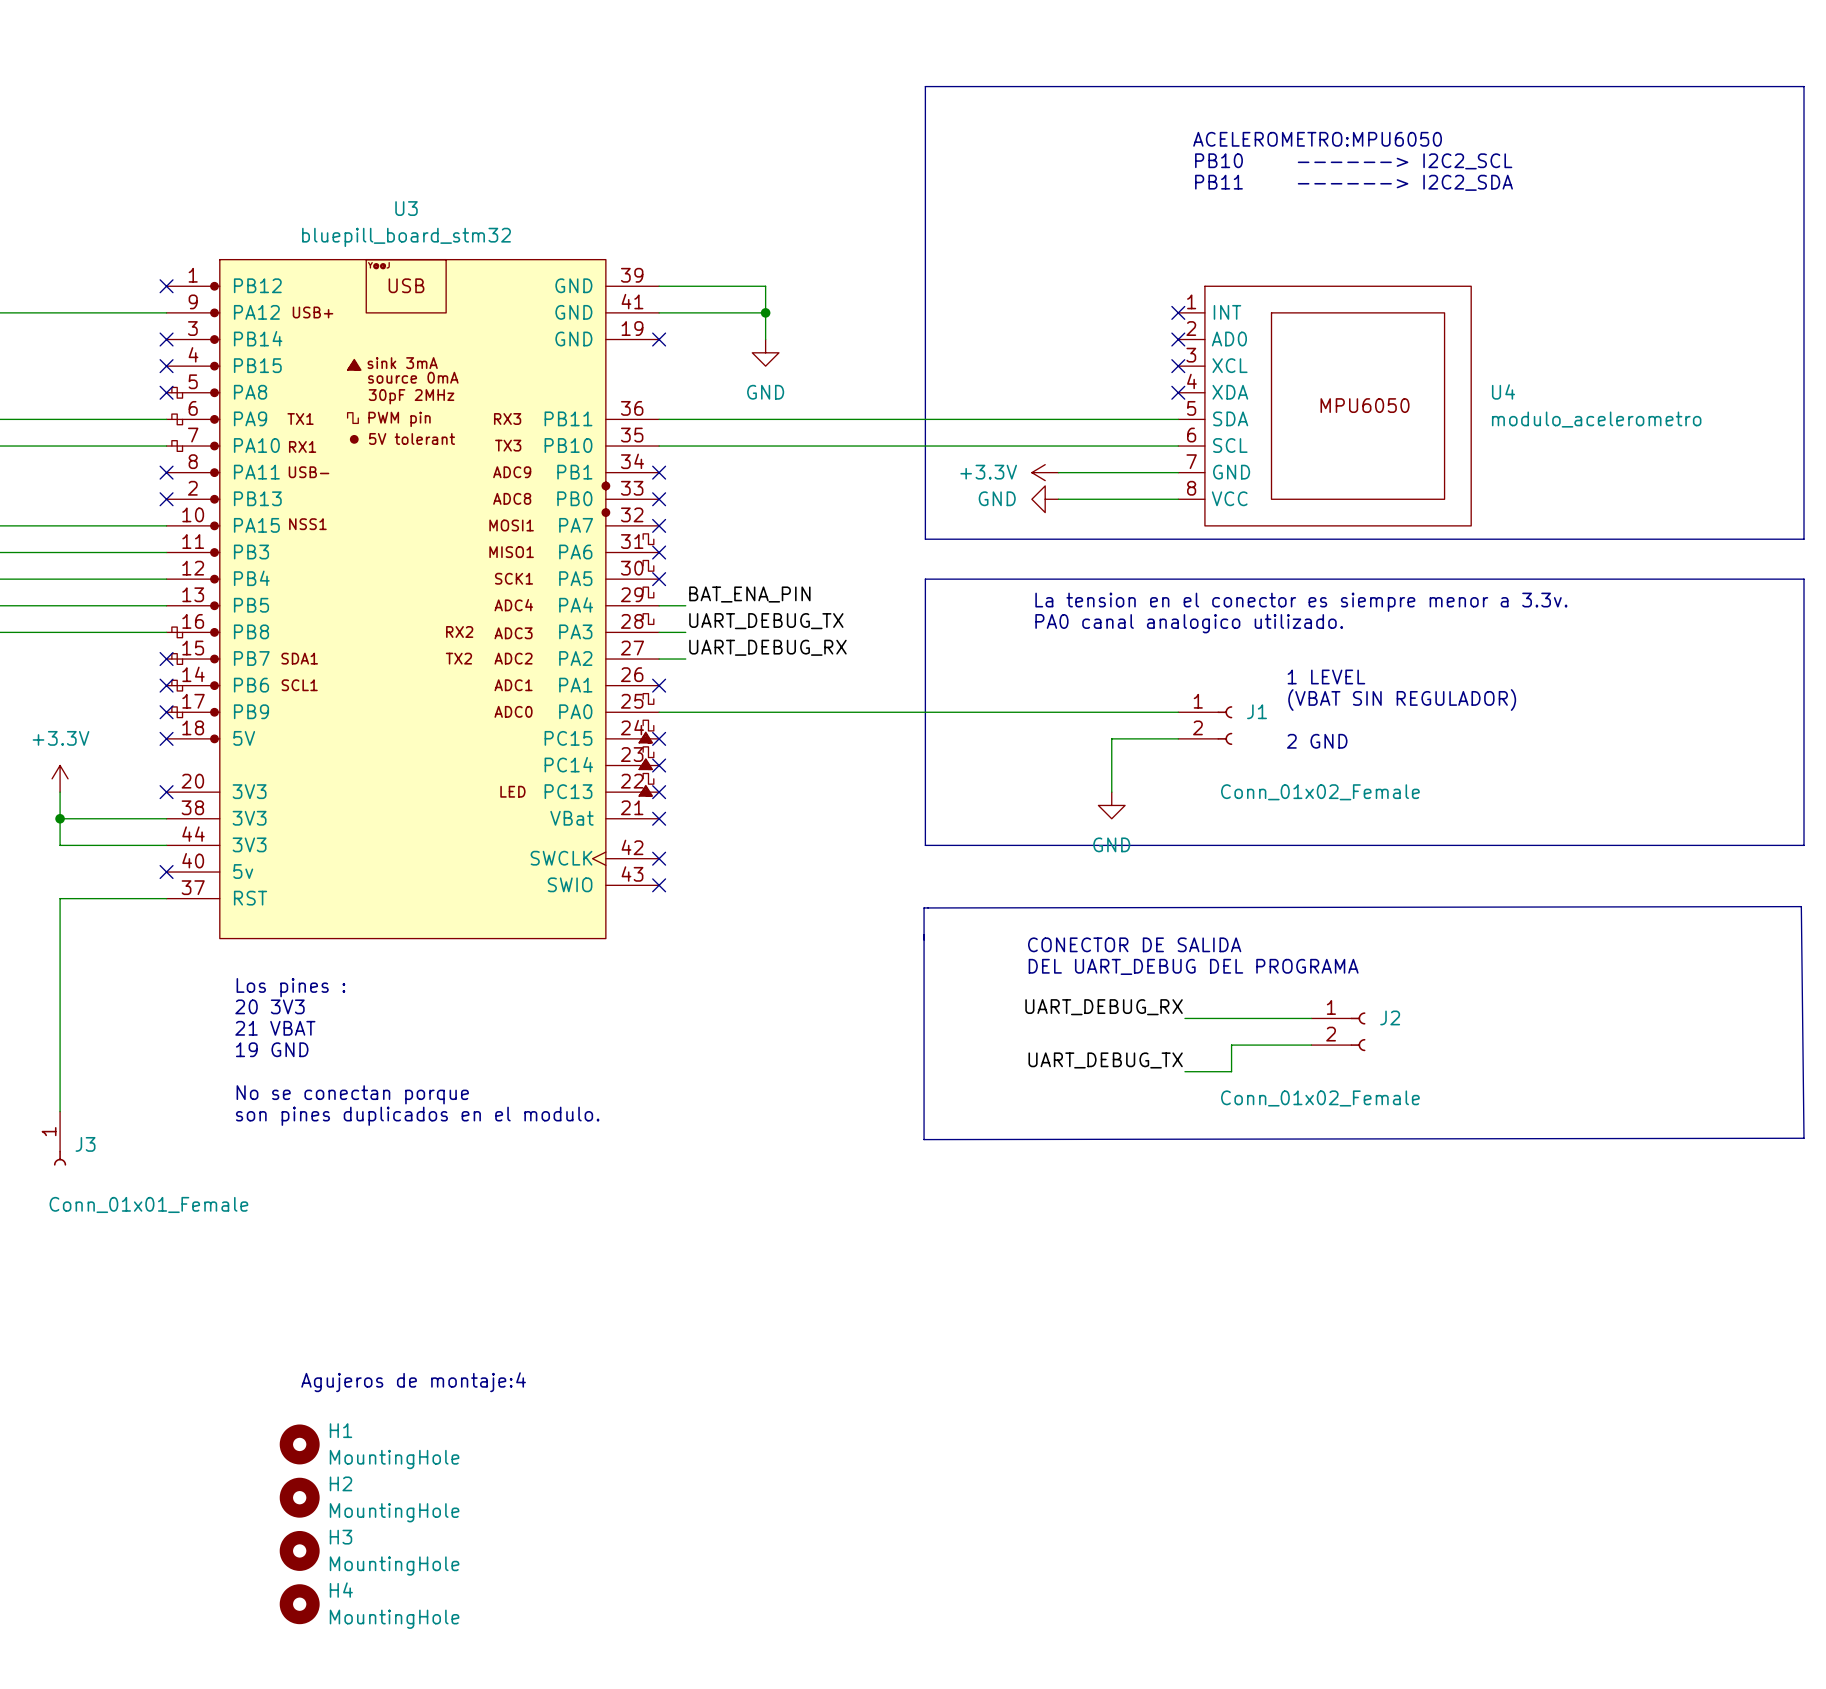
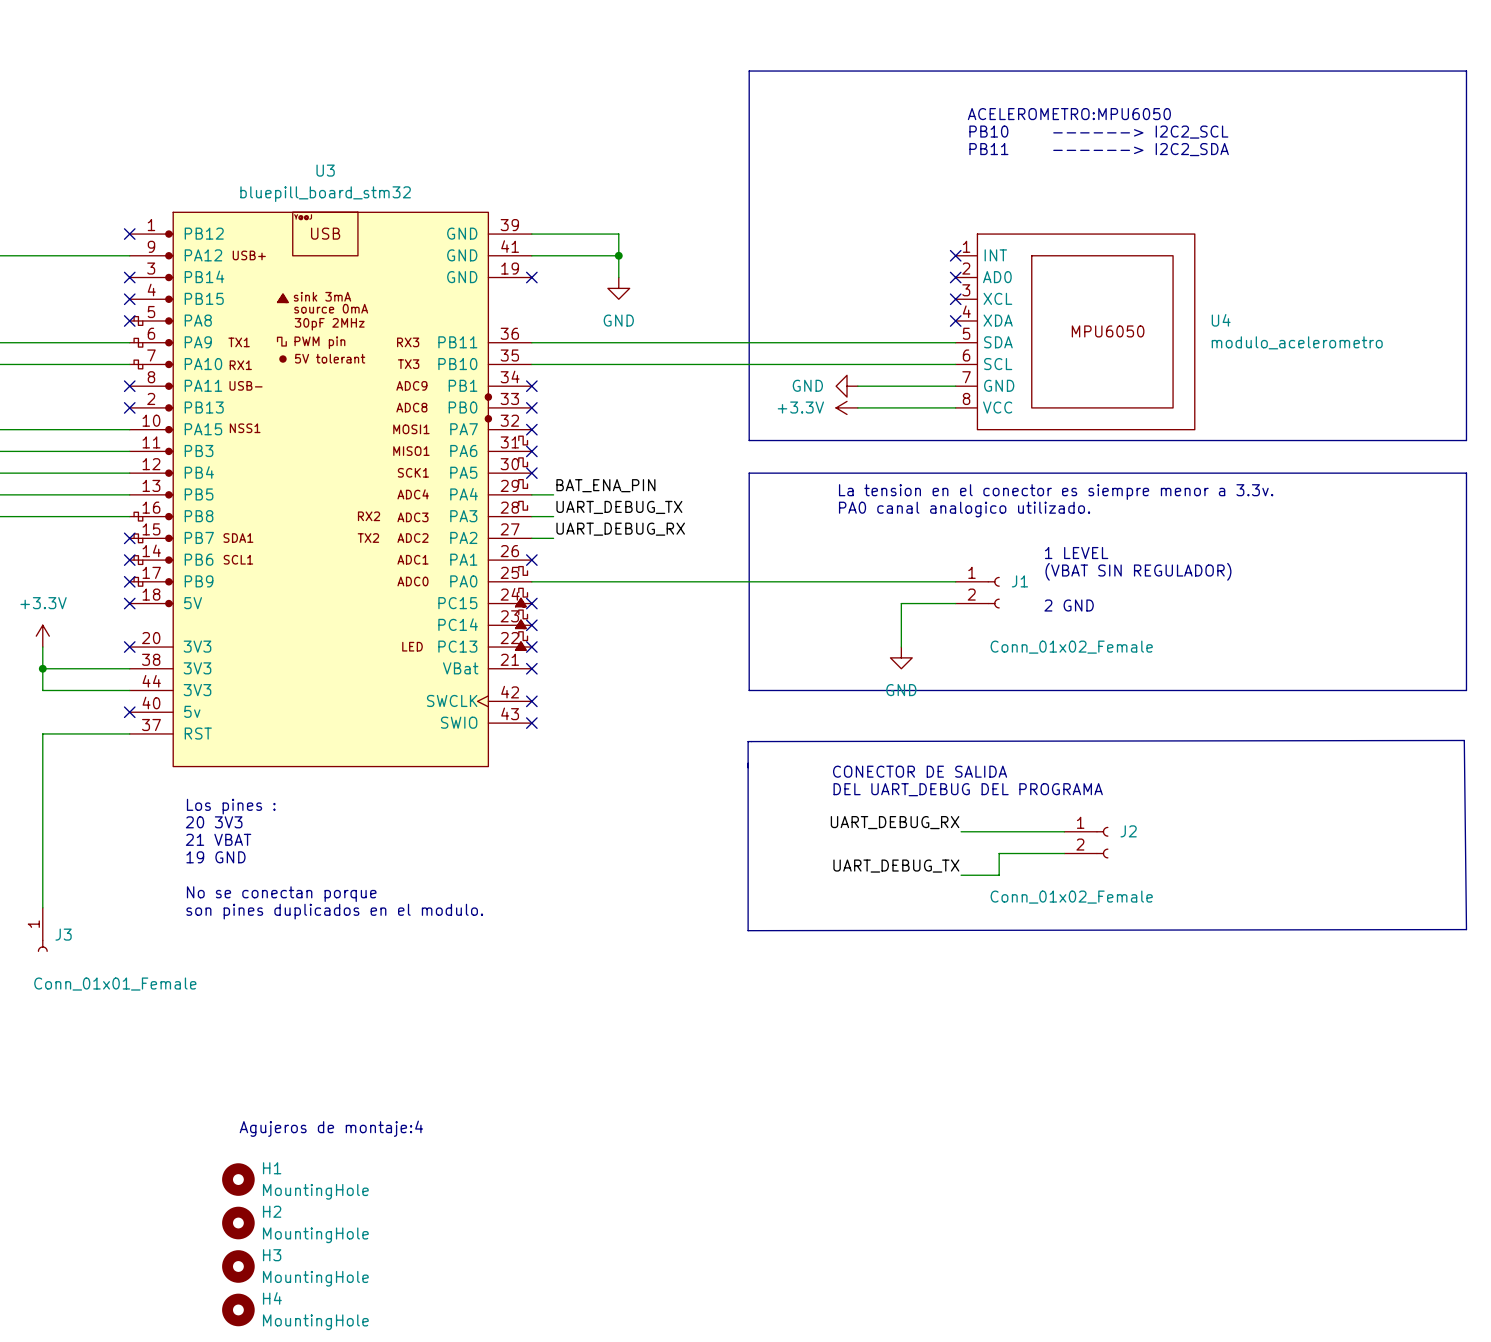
power symbol: +3.3V (1045, 472) -> GND (847, 386)
power symbol: GND (1045, 499) -> +3.3V (847, 407)

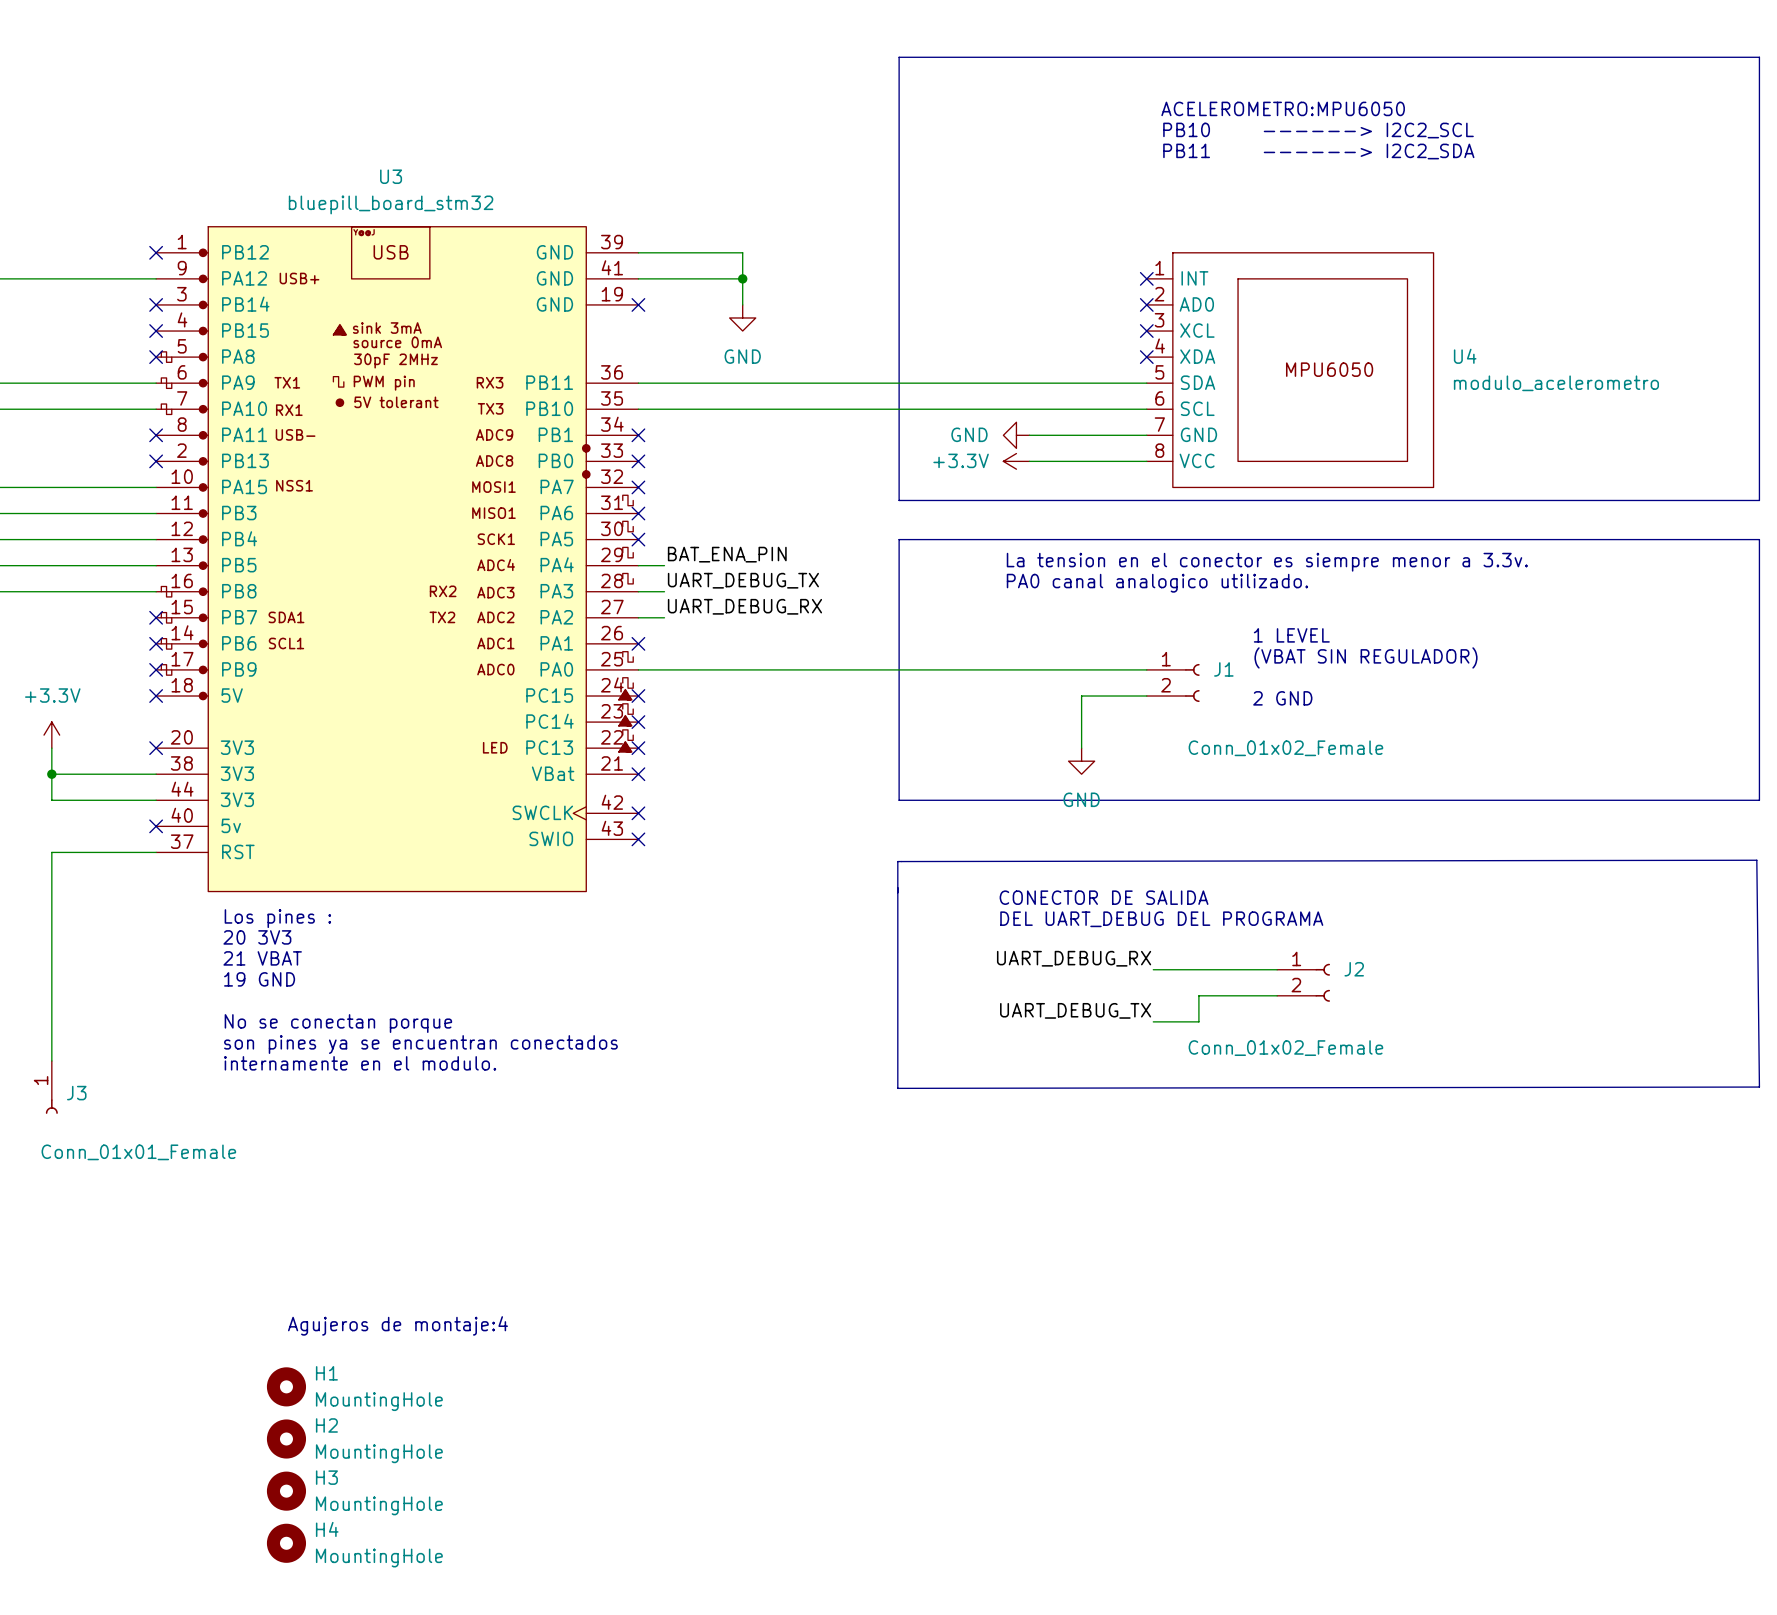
text: none -> Los pines : (277, 918)
text: Los pines : (231, 806) -> 20 3V3 (257, 937)
text: 20 3V3 (214, 822) -> 21 VBAT (262, 958)
text: 21 VBAT (218, 839) -> 19 GND (259, 979)
text: 19 GND (215, 857) -> none
text: none -> No se conectan porque (338, 1023)
text: No se conectan porque (281, 894) -> son pines ya se encuentran conectados (420, 1044)
text: son pines duplicados en el modulo. (334, 911) -> internamente en el modulo. (360, 1063)

